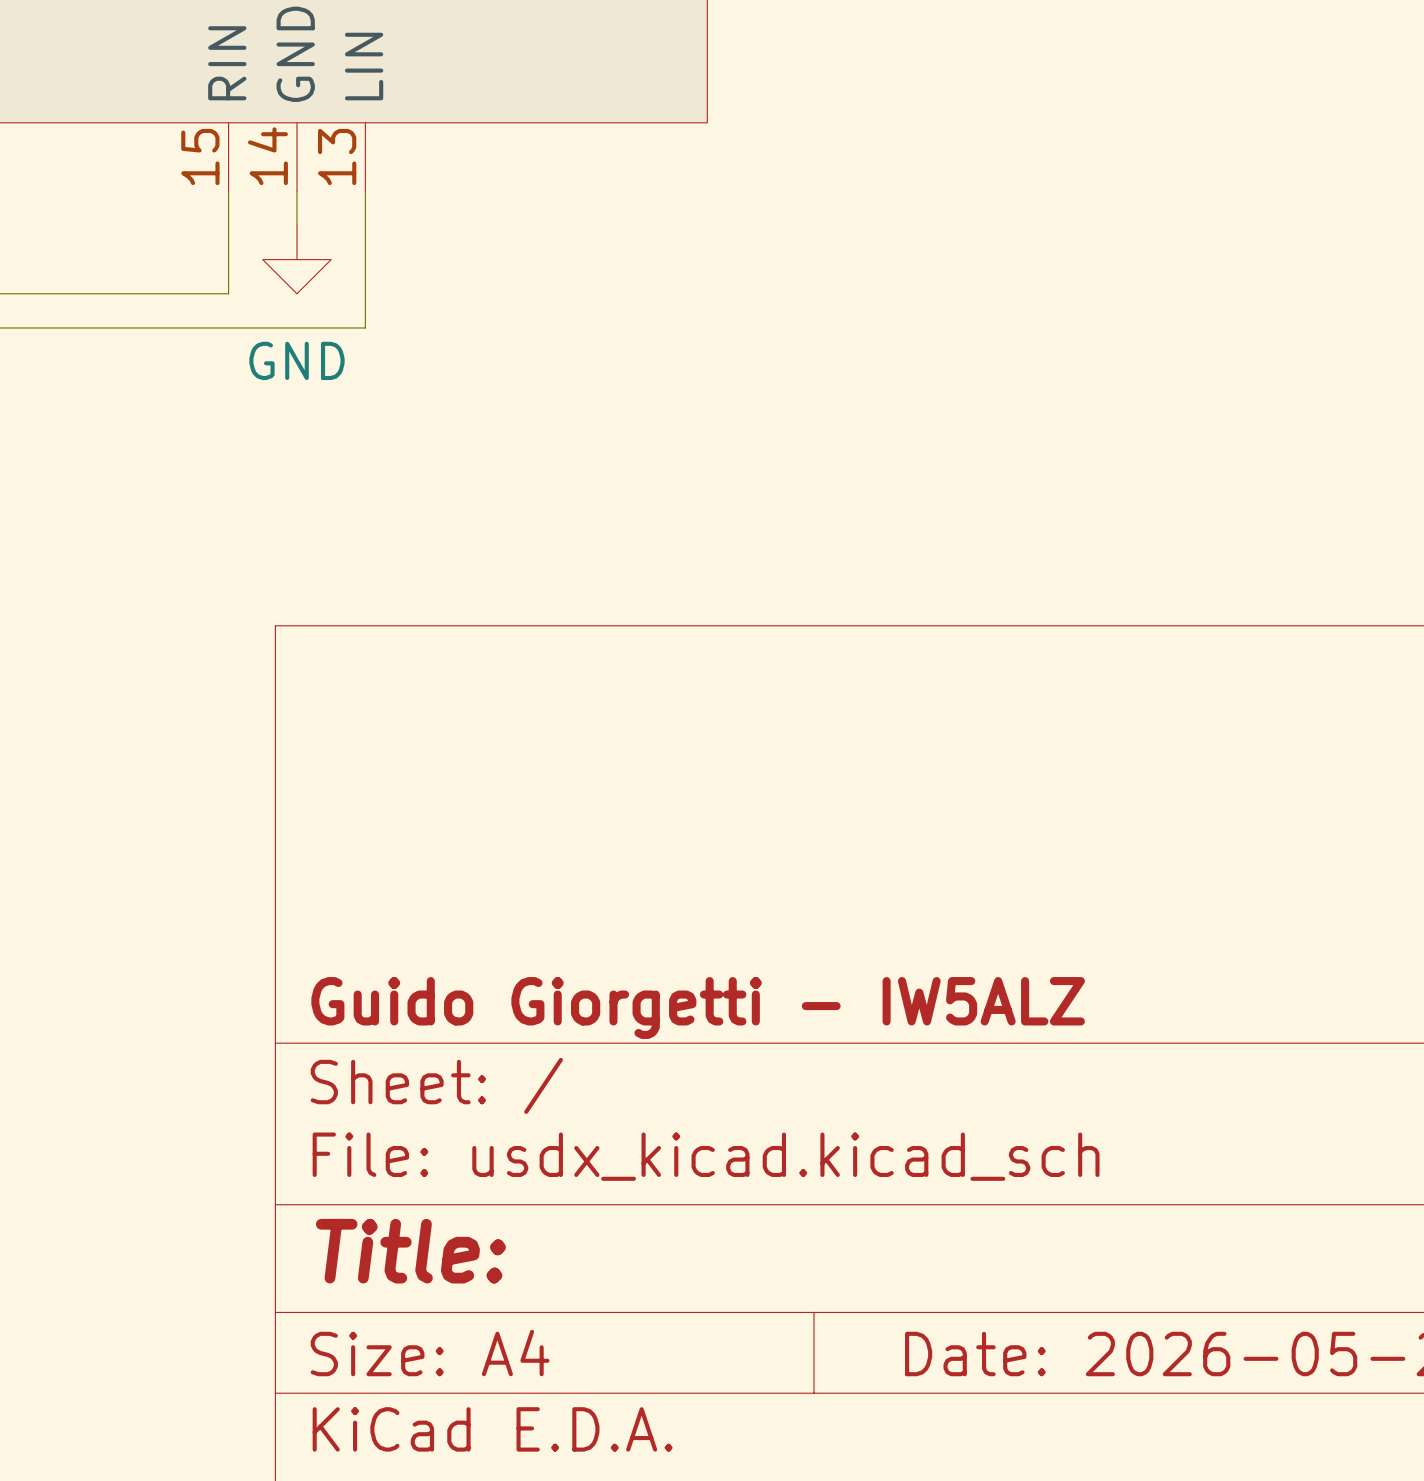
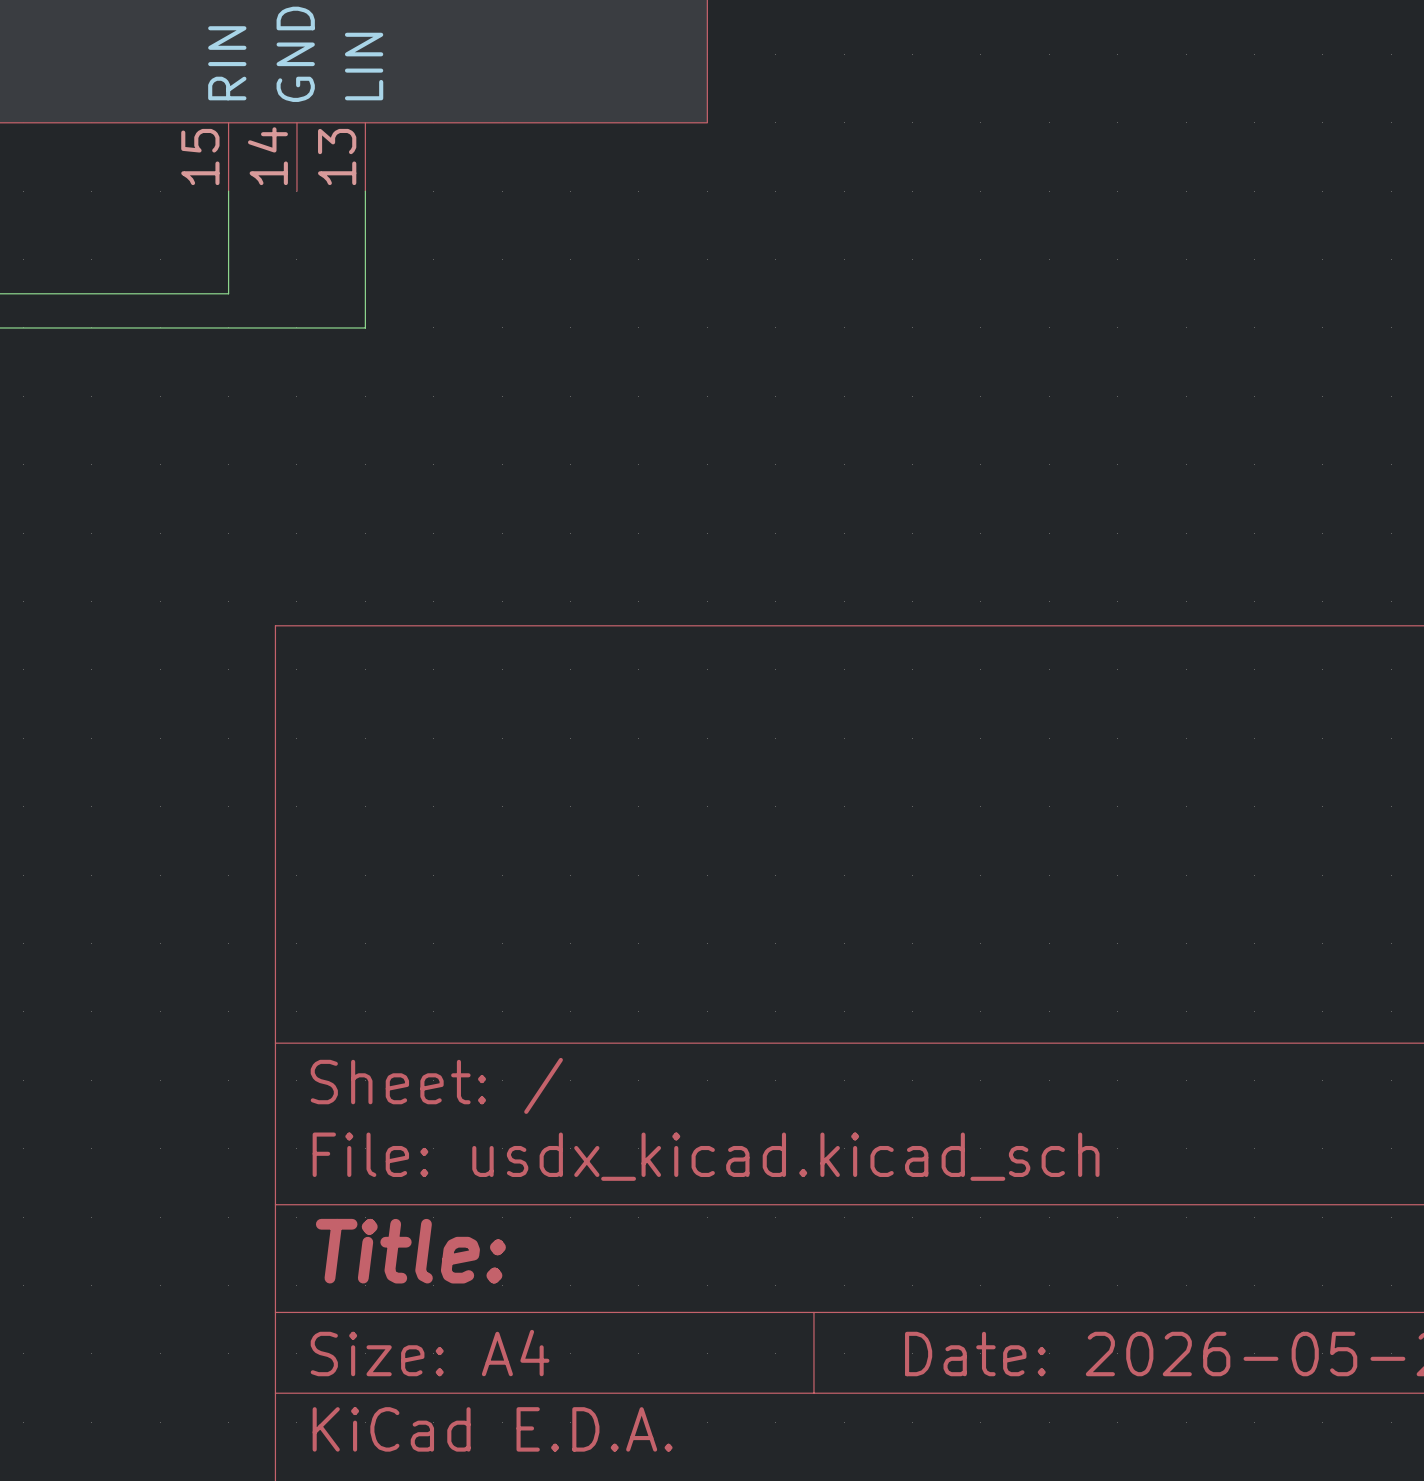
wire: (296, 191) (296, 225) -> none
power symbol: GND (296, 259) -> none
title block: Guido Giorgetti - IW5ALZ (698, 1008) -> none

